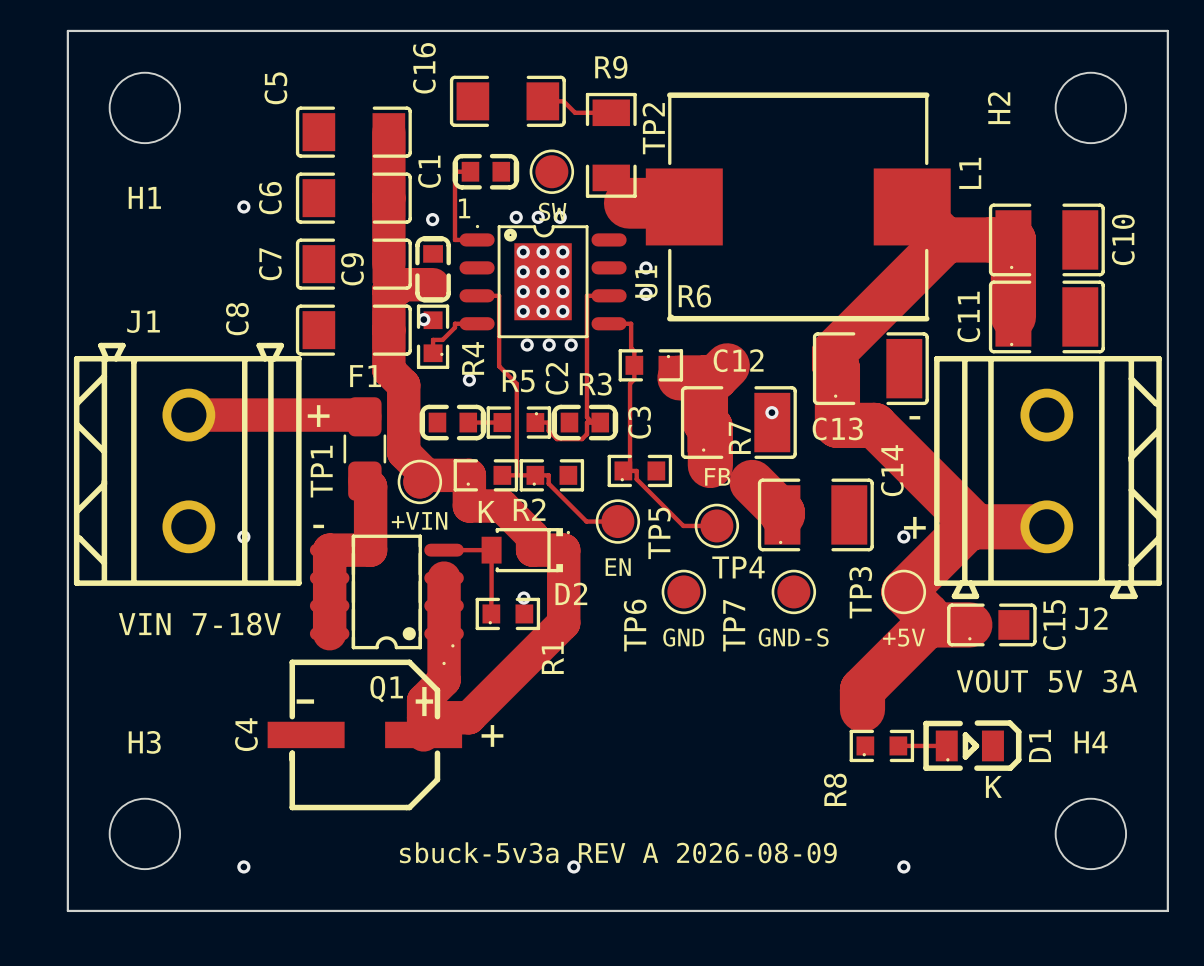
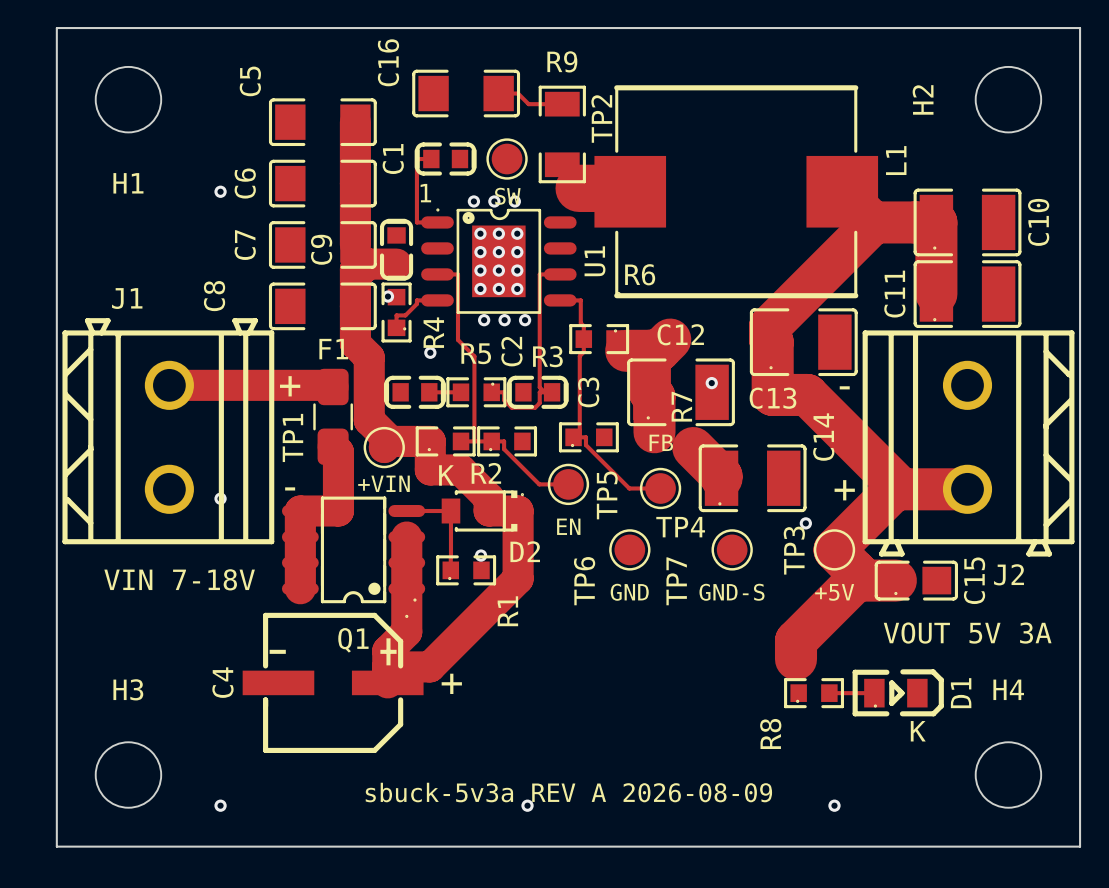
via: (432, 219) -> none
via: (646, 267) -> none
via: (646, 294) -> none
via position: (903, 536) -> (805, 523)

